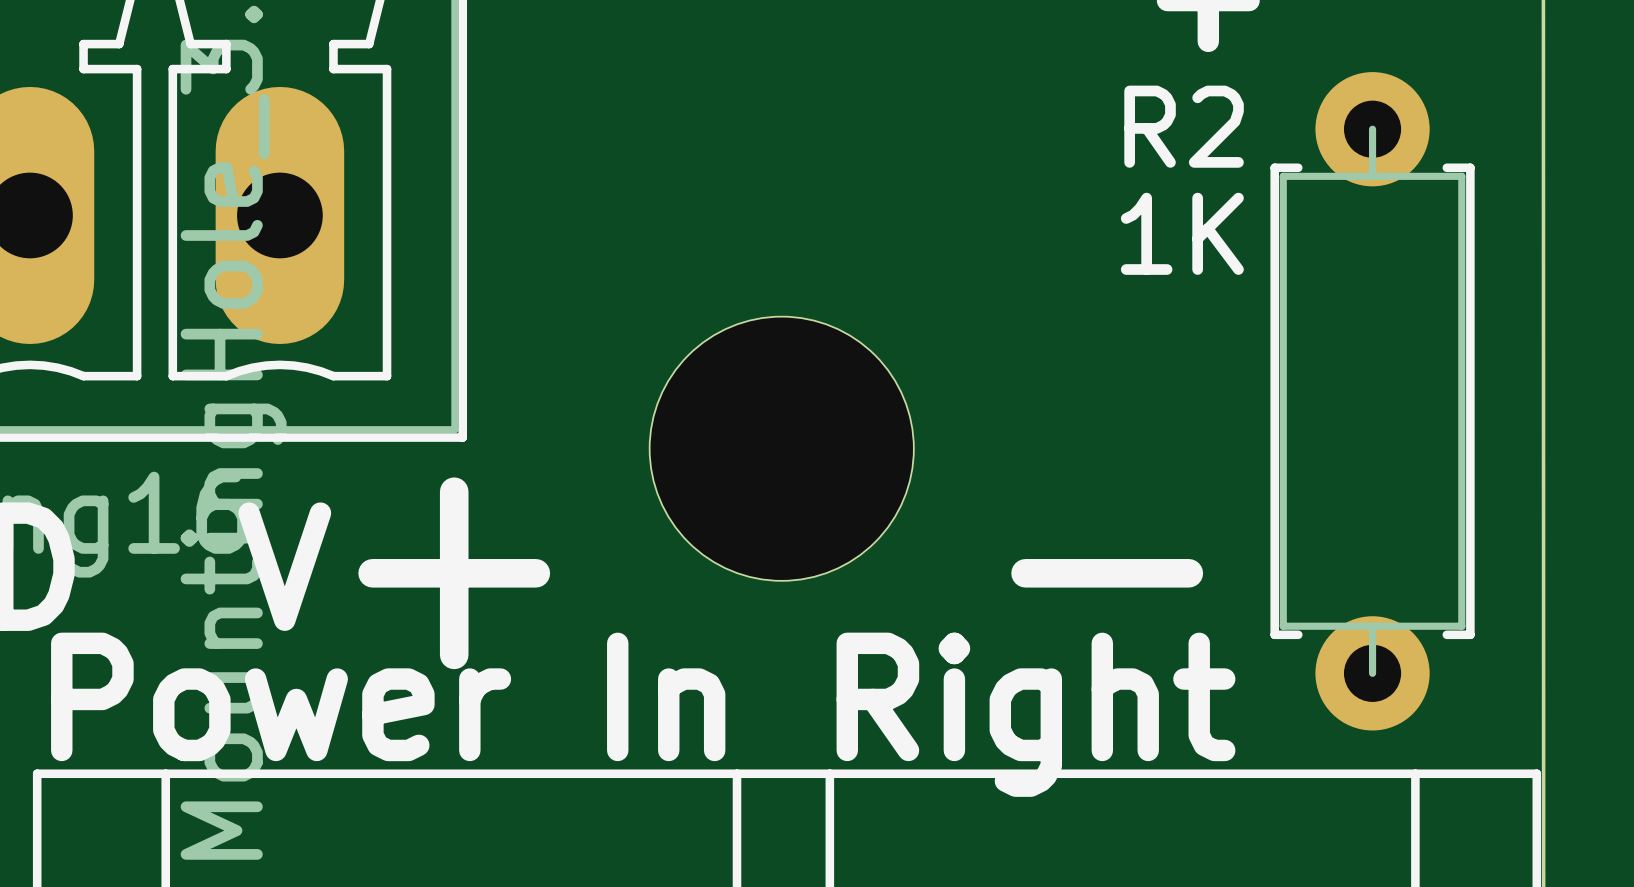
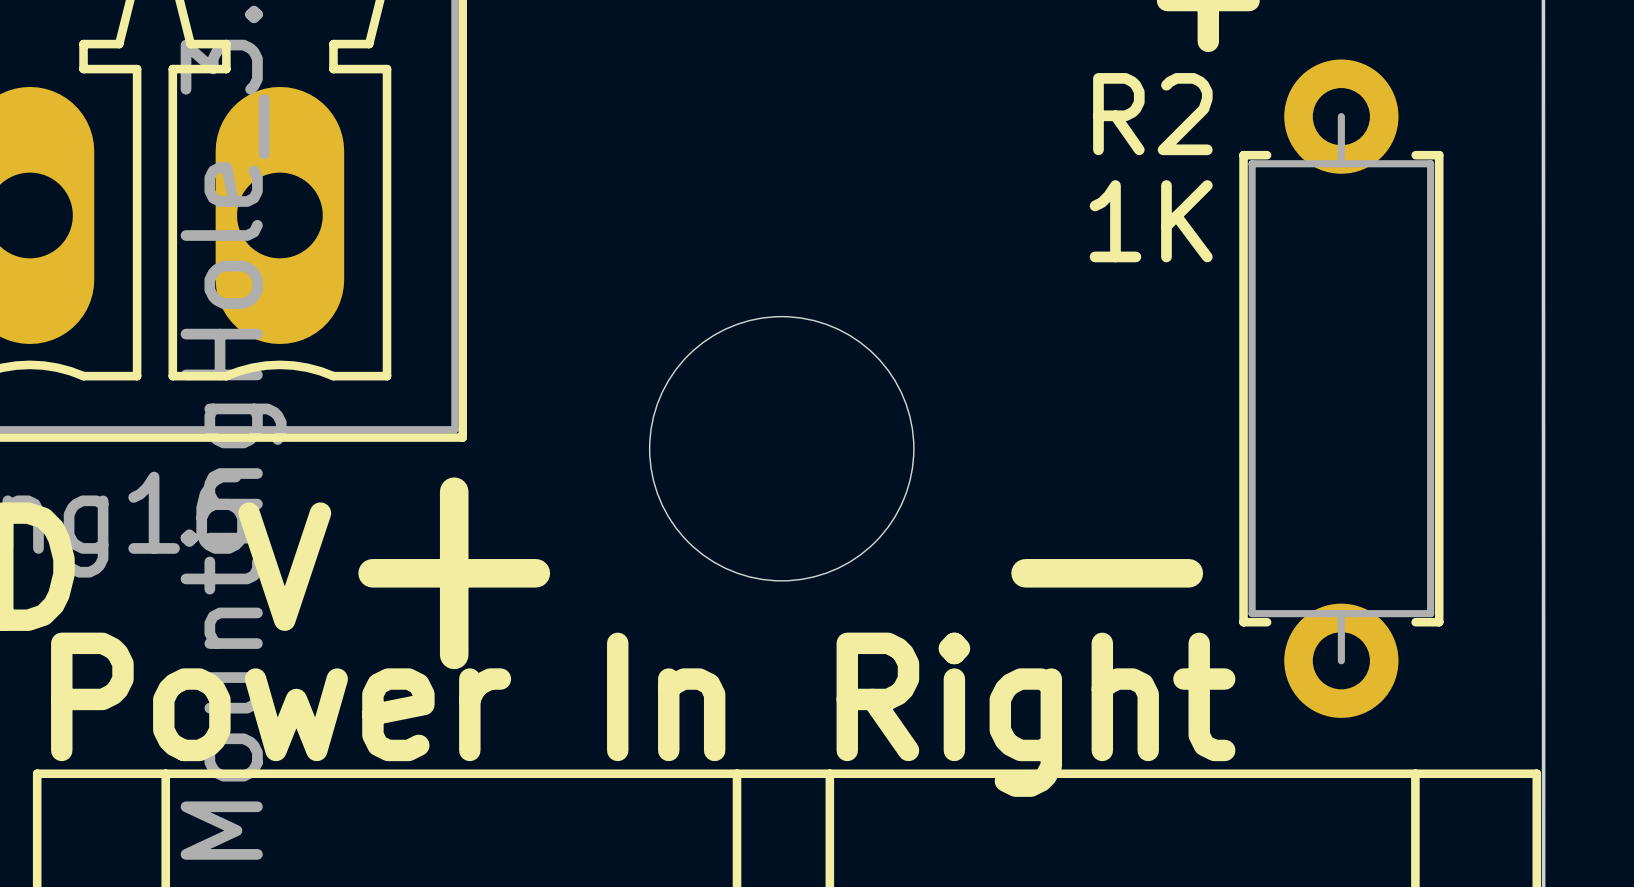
R2 position: (1372, 401) -> (1341, 388)

